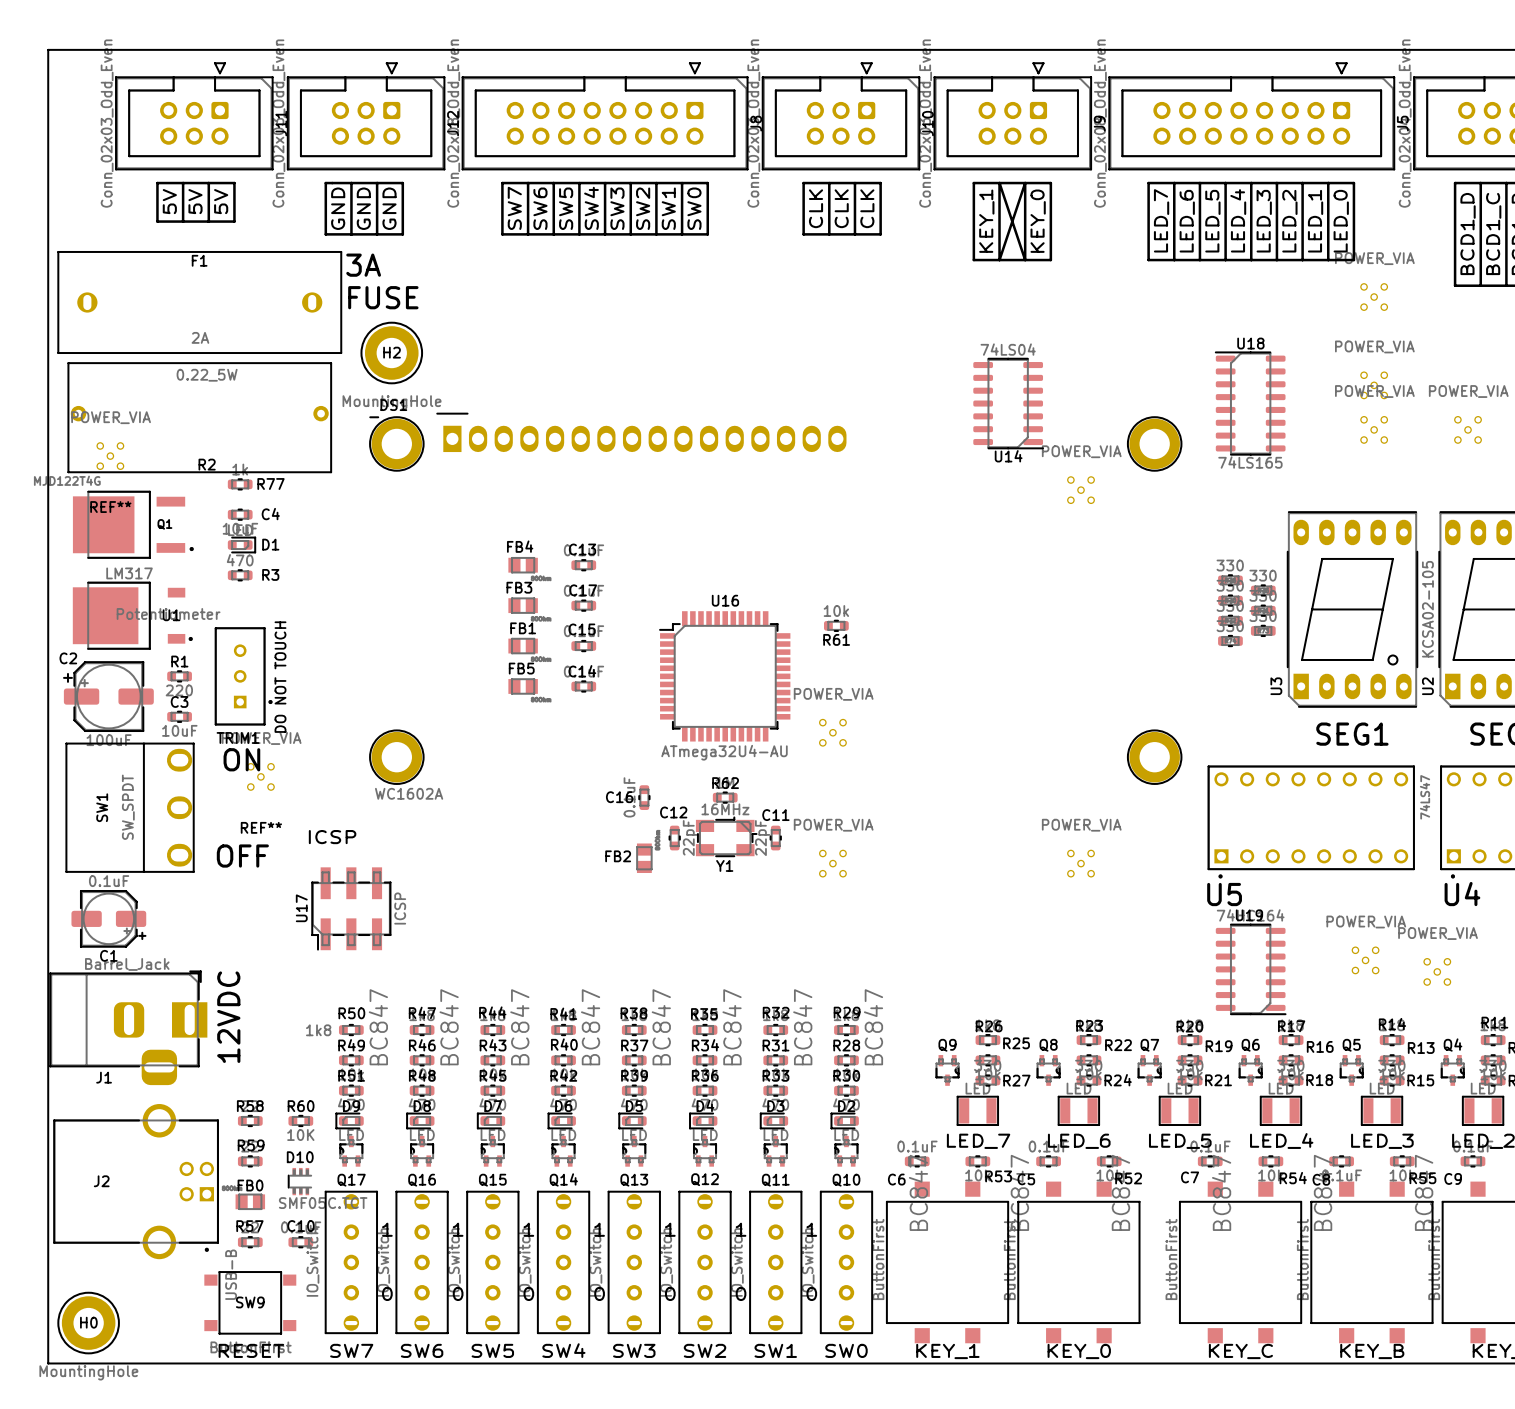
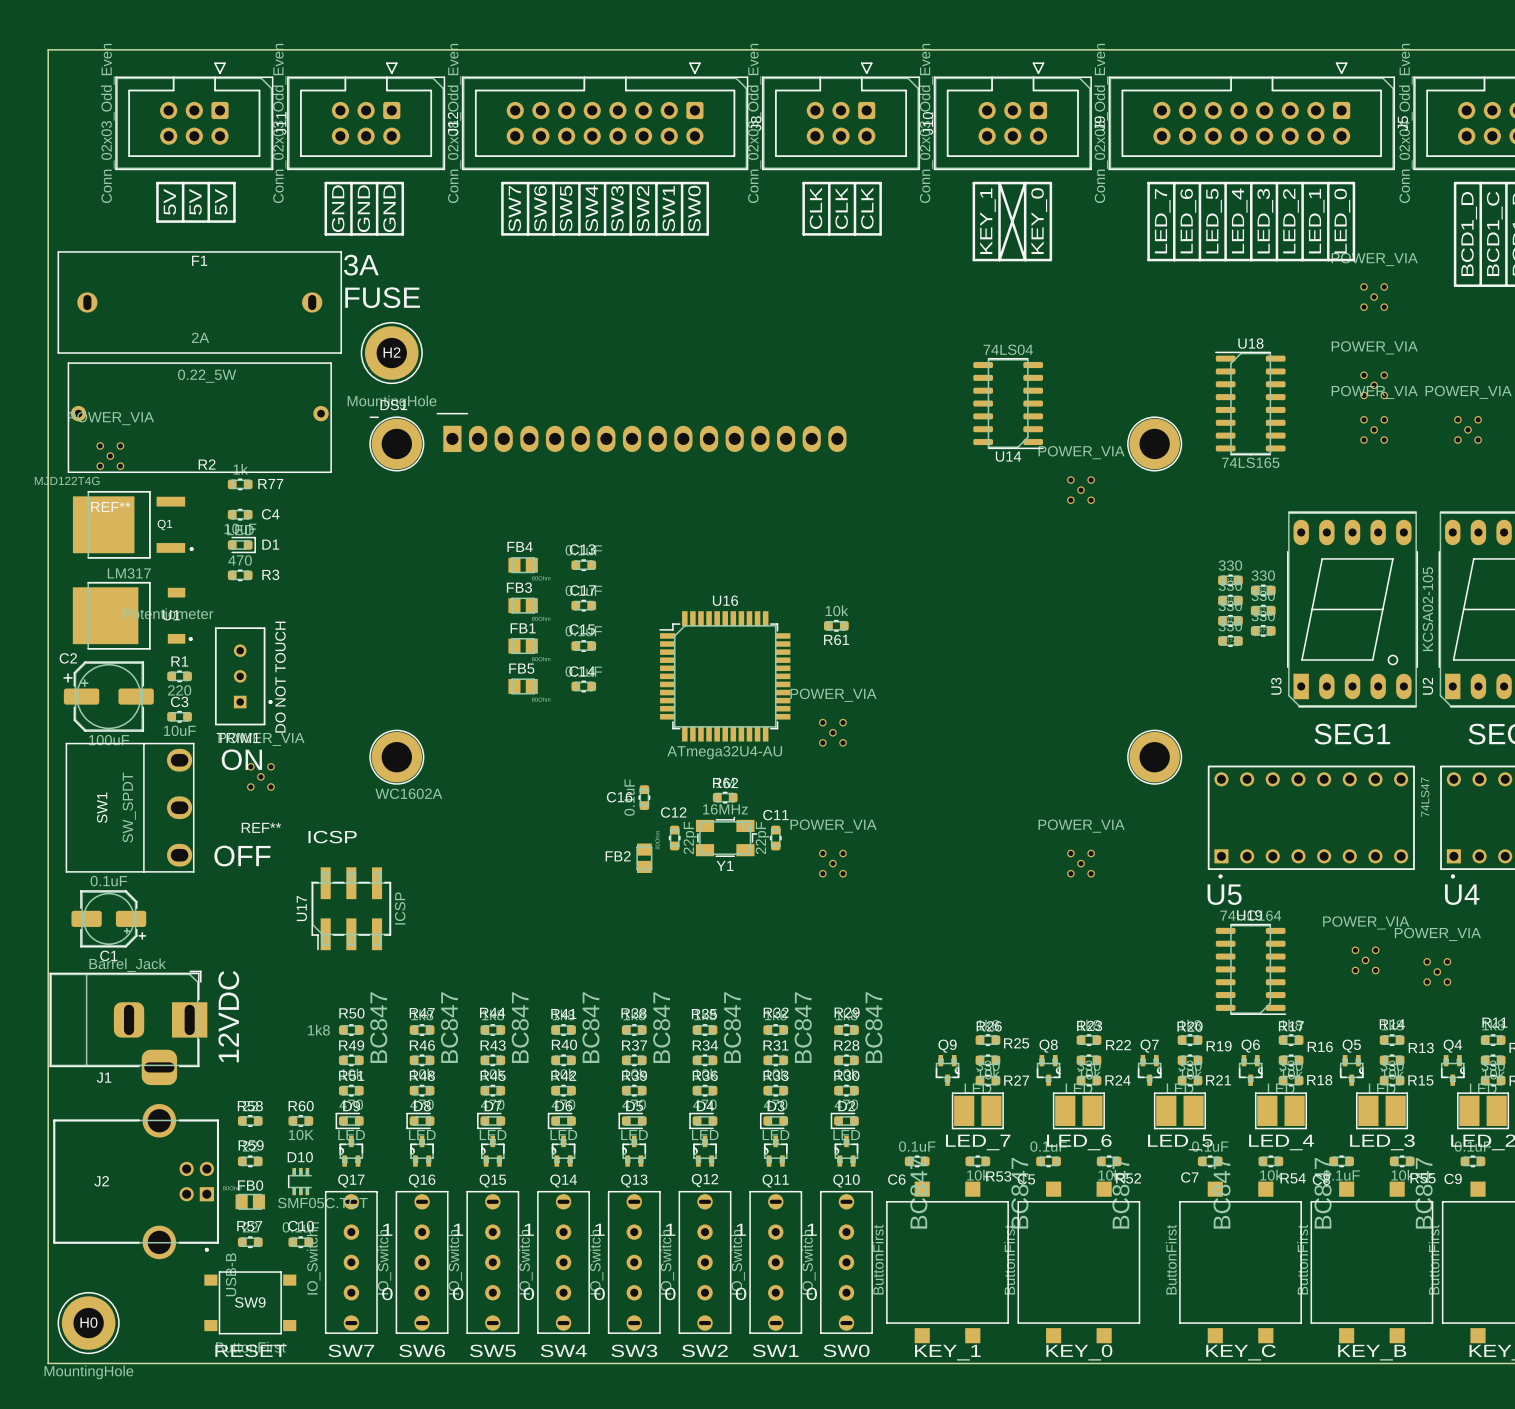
part footprint: [957, 1096, 999, 1126] -> [951, 1092, 1004, 1130]
part footprint: [1058, 1096, 1100, 1126] -> [1053, 1092, 1105, 1130]
part footprint: [1159, 1096, 1201, 1126] -> [1154, 1092, 1206, 1130]
part footprint: [1260, 1096, 1302, 1126] -> [1255, 1092, 1307, 1130]
part footprint: [1361, 1096, 1403, 1126] -> [1356, 1092, 1408, 1130]
part footprint: [1462, 1096, 1504, 1126] -> [1457, 1092, 1509, 1130]

